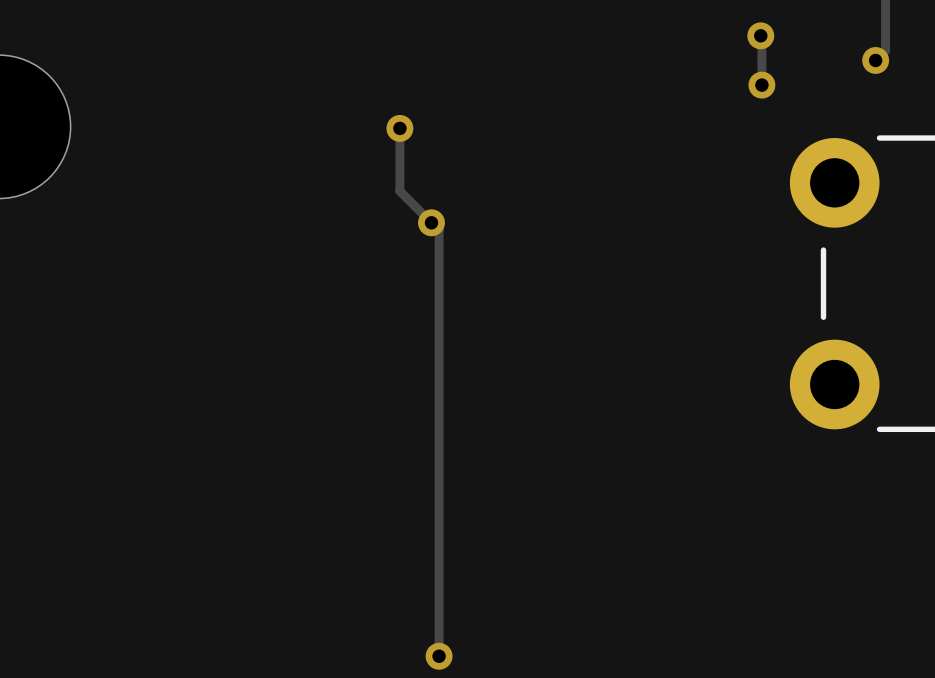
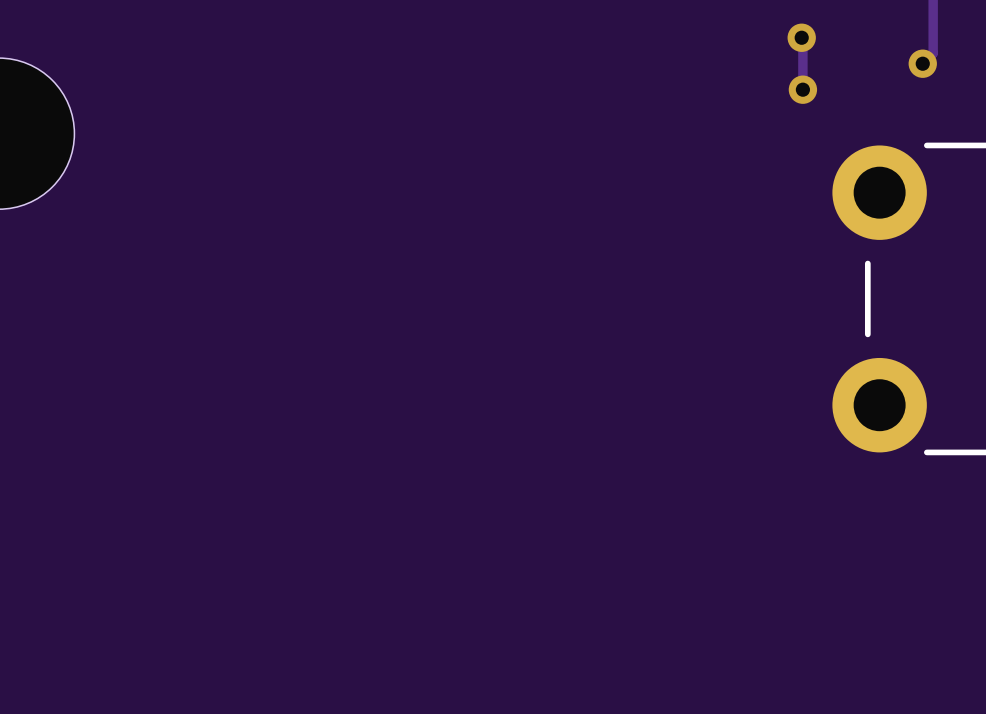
track: (399, 128) (399, 191) (439, 230) (439, 656) -> none
via: (399, 128) -> none
via: (431, 222) -> none
via: (439, 656) -> none

